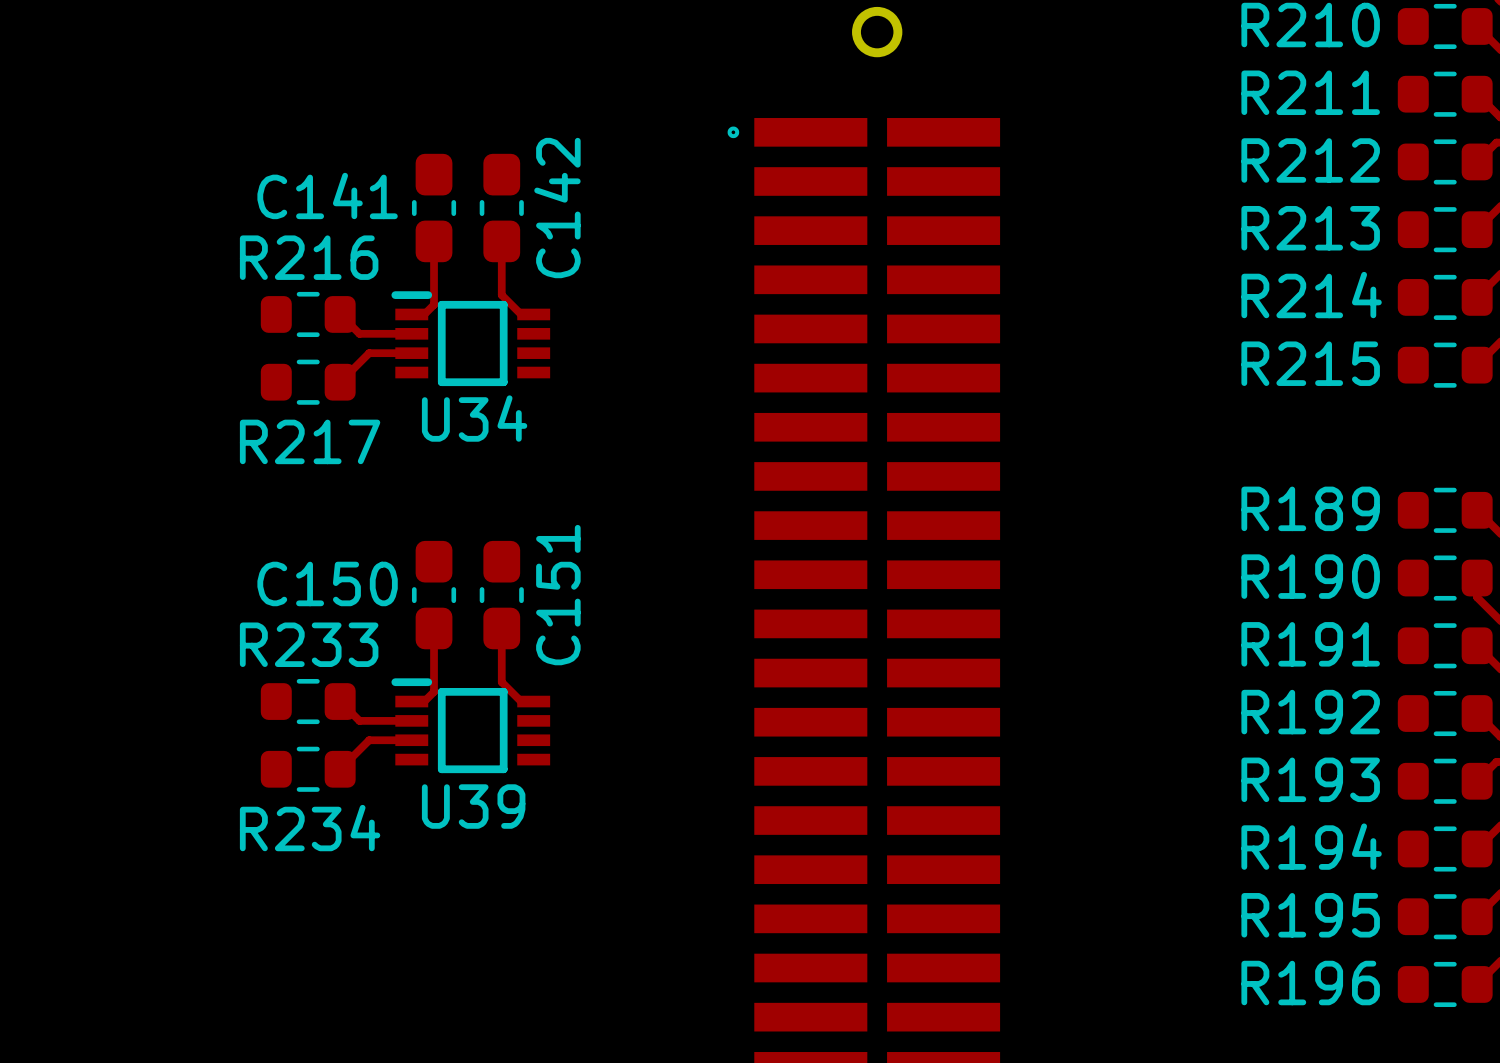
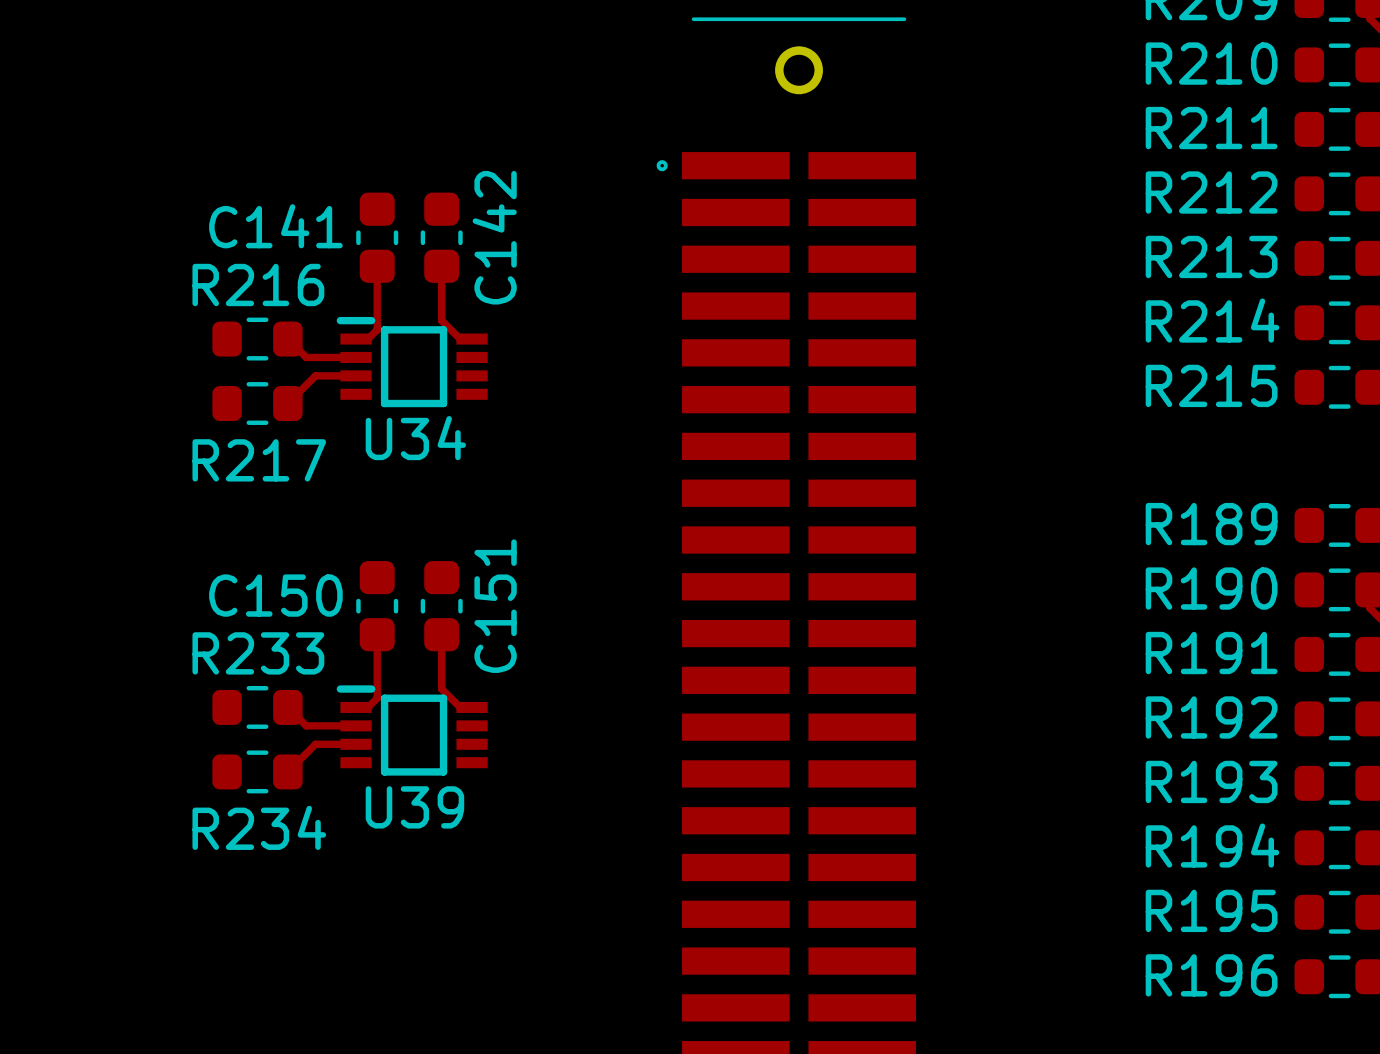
C141 footprint: [411, 153, 457, 263] -> [356, 192, 399, 283]
C142 footprint: [479, 153, 524, 263] -> [420, 192, 463, 283]
C150 footprint: [411, 540, 457, 650] -> [356, 561, 399, 652]
C151 footprint: [479, 540, 524, 650] -> [420, 561, 463, 652]

